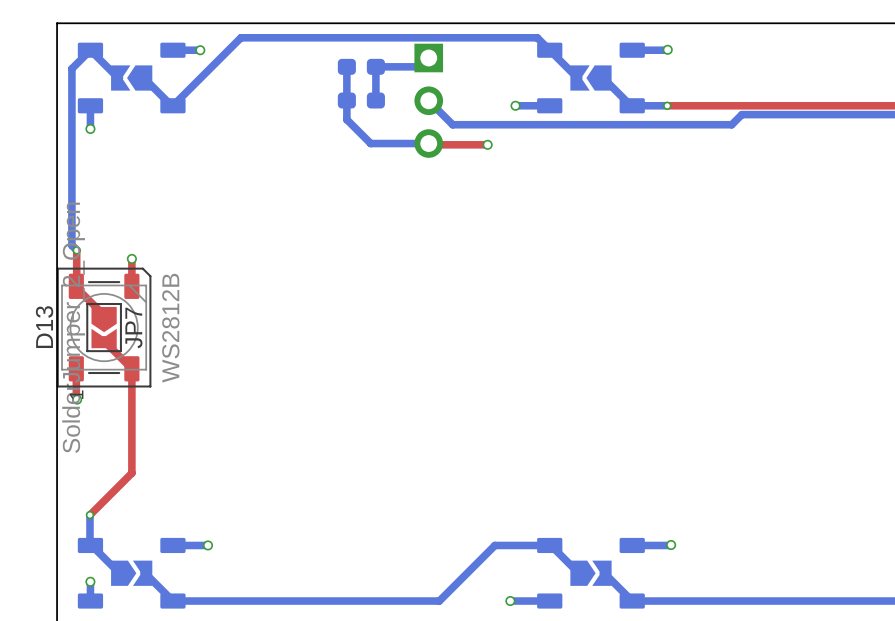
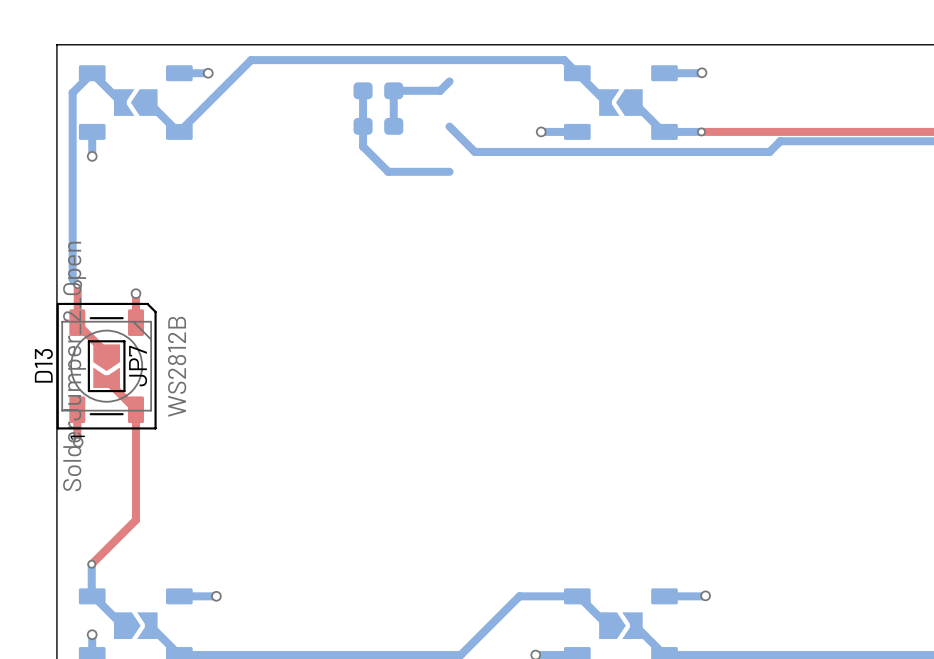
part: (428, 100) -> none
top track: (437, 144) (487, 144) -> none
via: (487, 144) -> none

